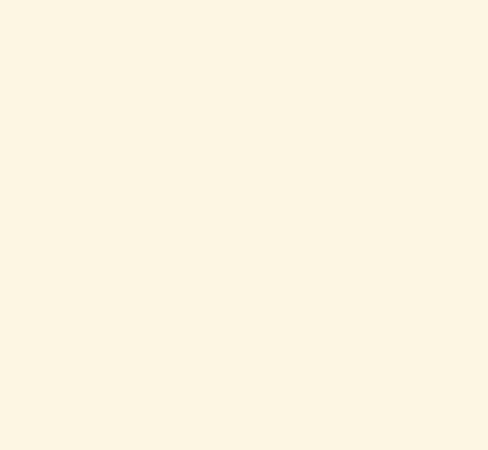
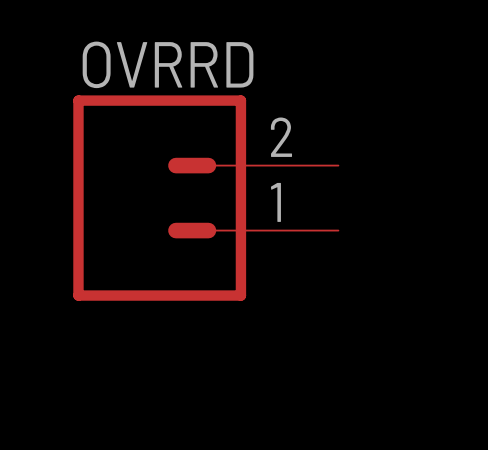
OVRRD: none -> (205, 198)

